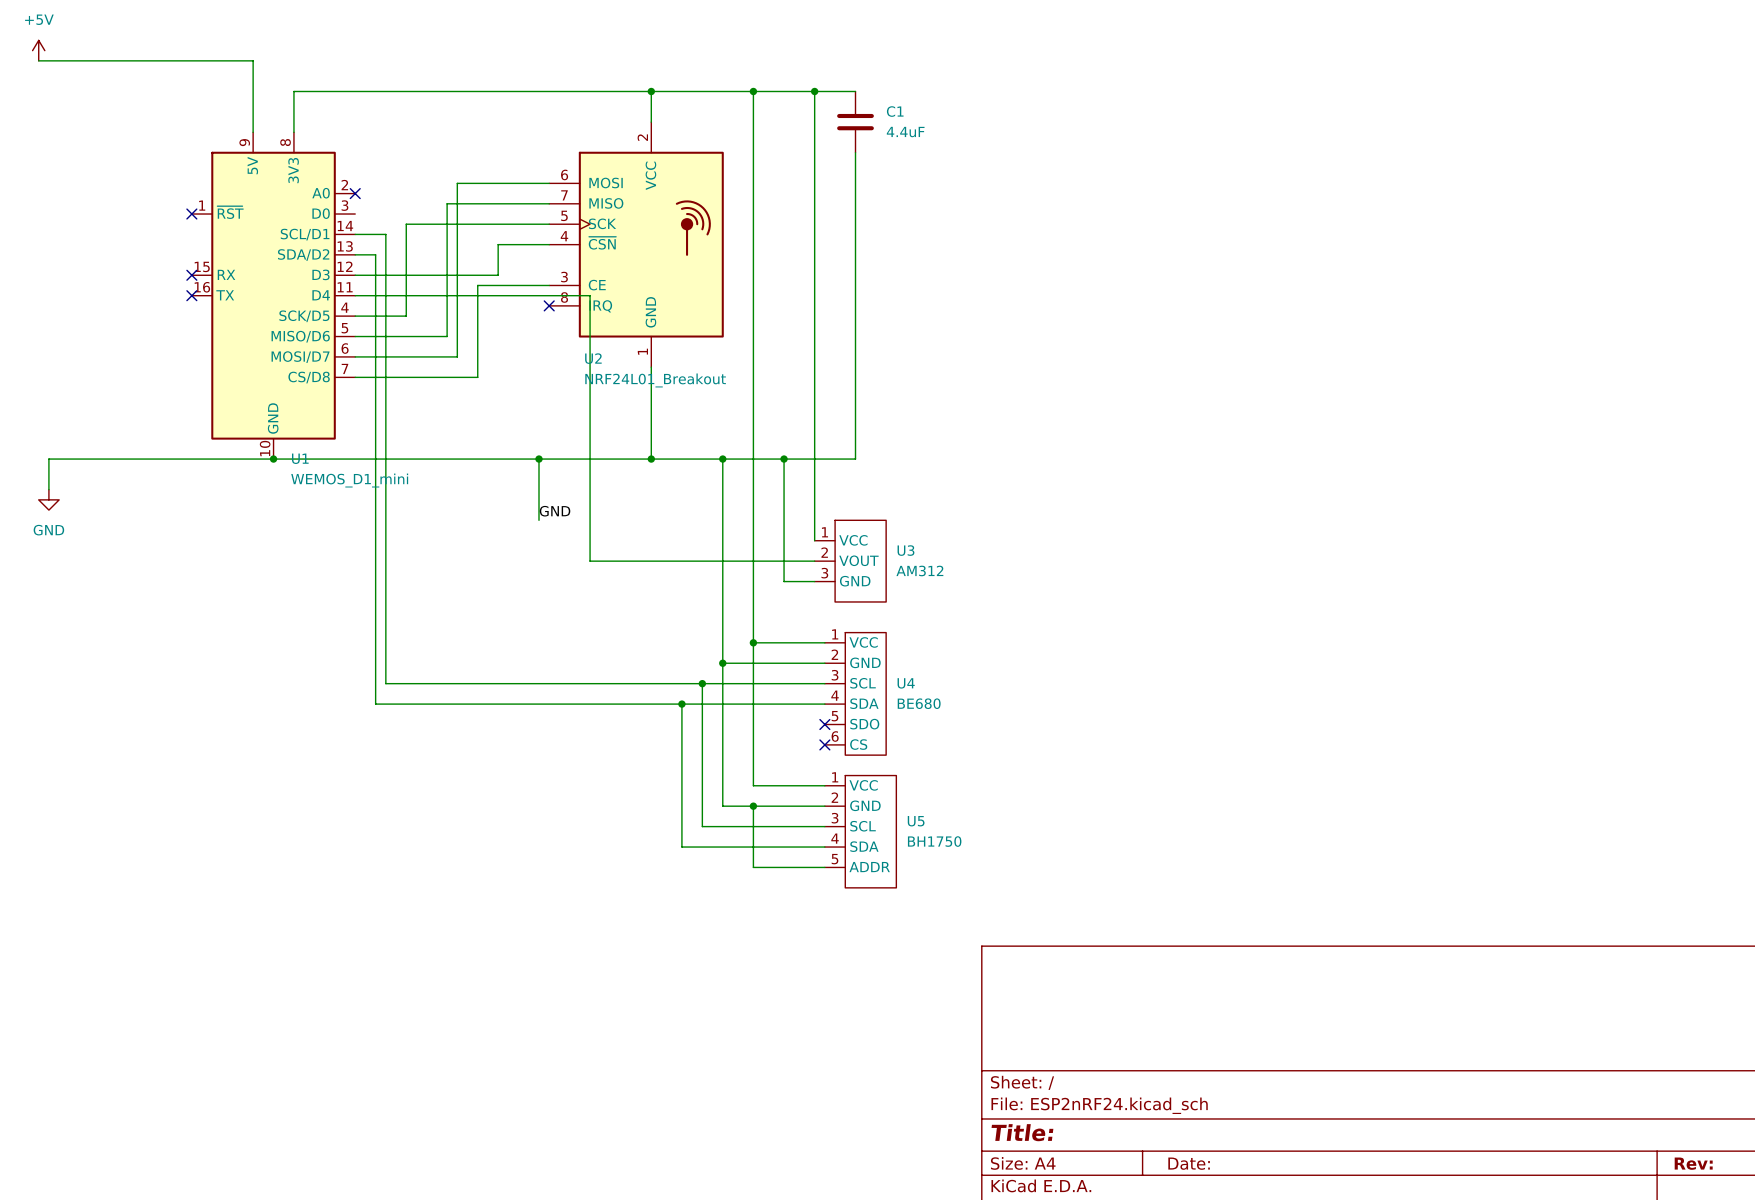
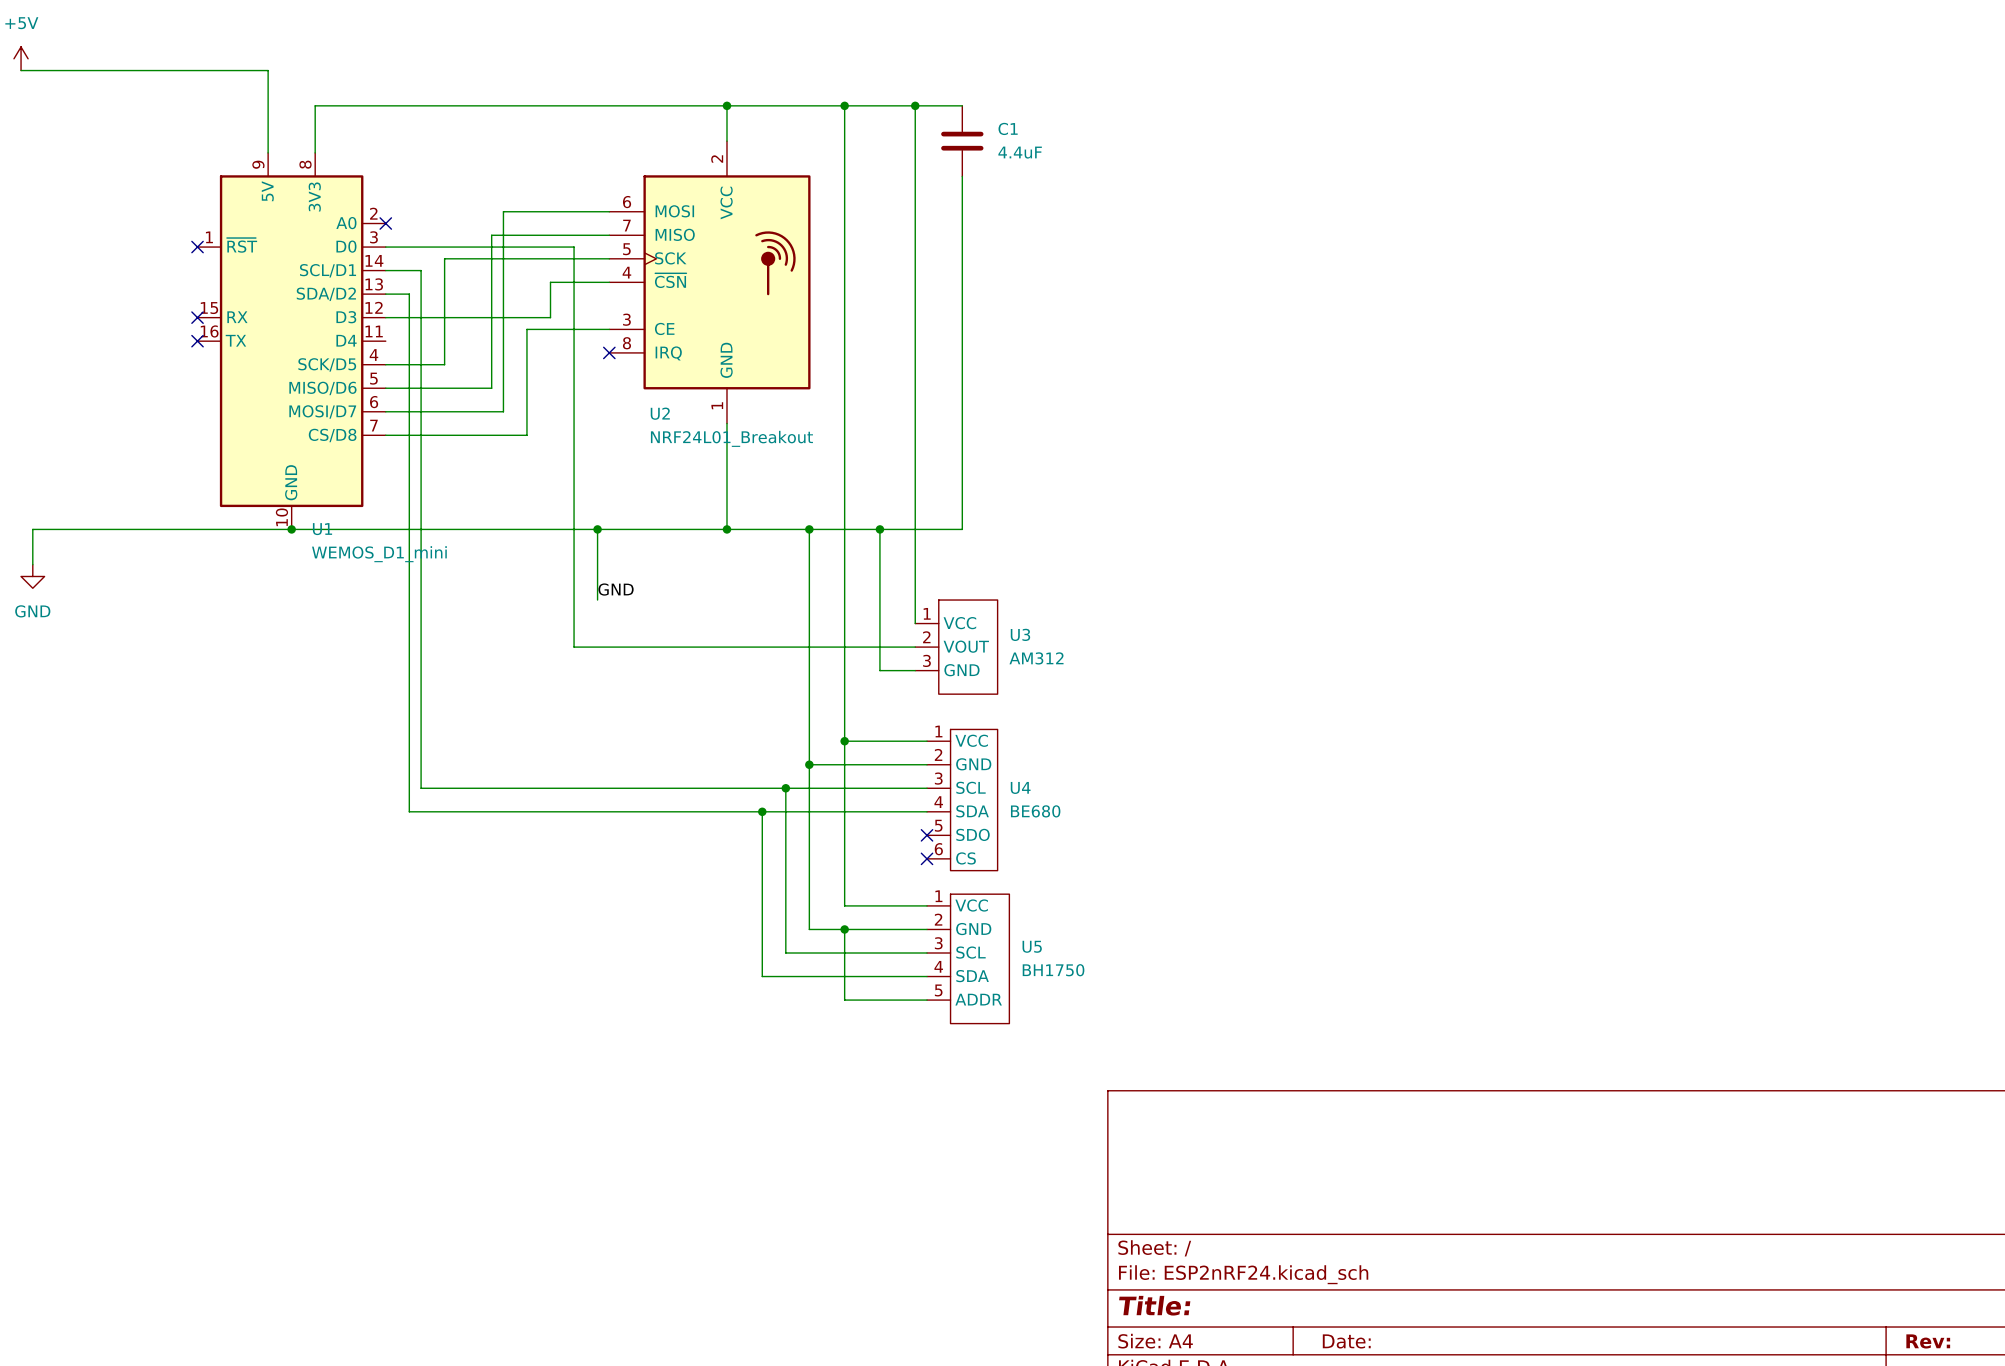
wire: (355, 295) (590, 295) (590, 561) -> (385, 247) (574, 247) (574, 647) (656, 647)

